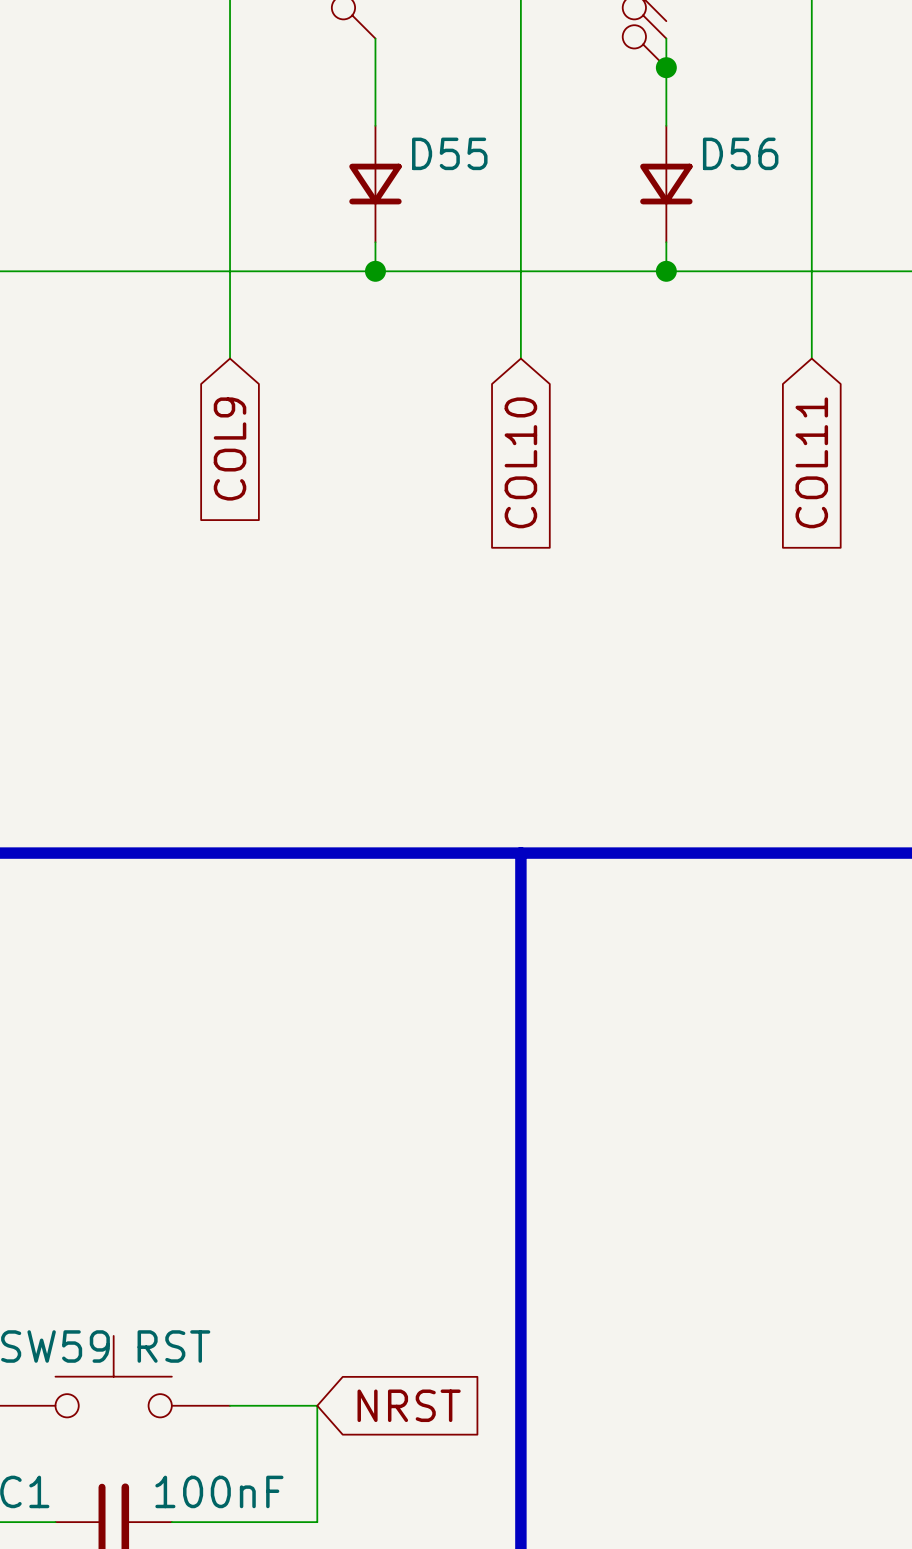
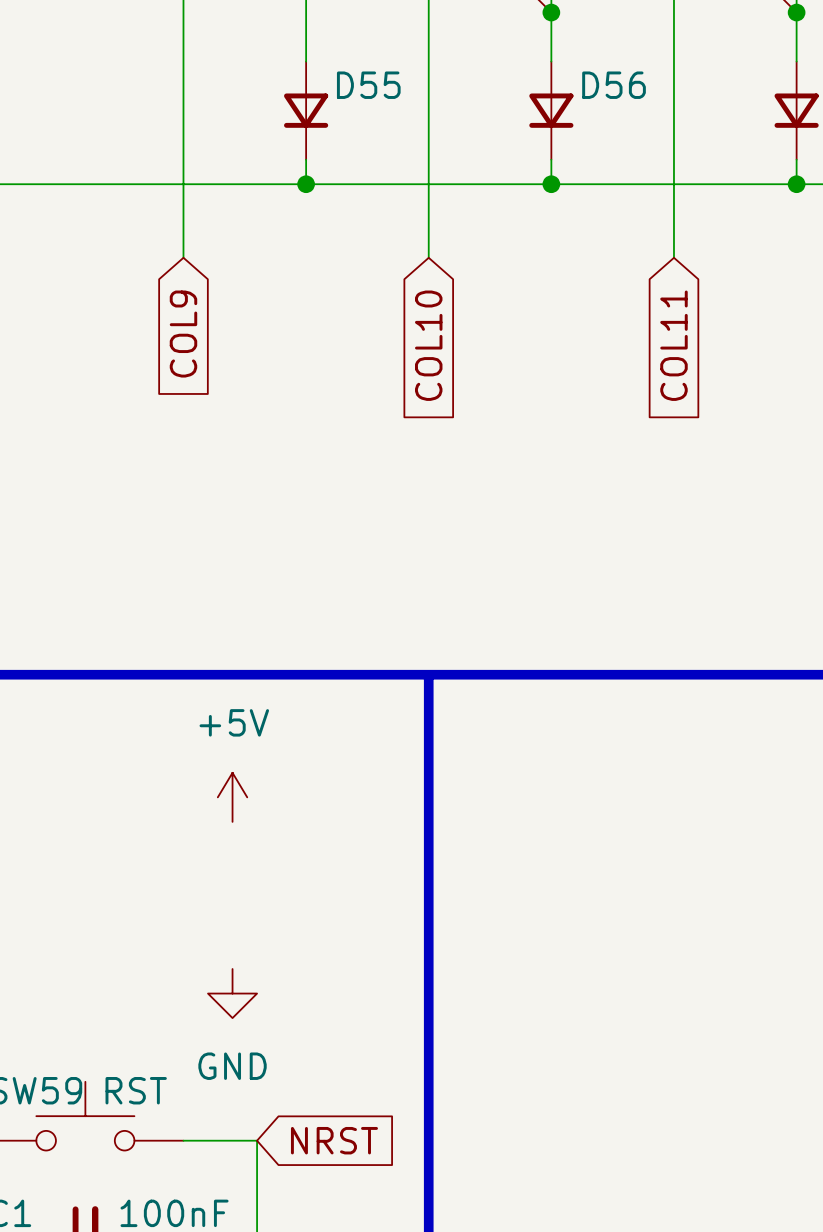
power symbol: none -> +5V (232, 797)
power symbol: none -> GND (232, 993)

